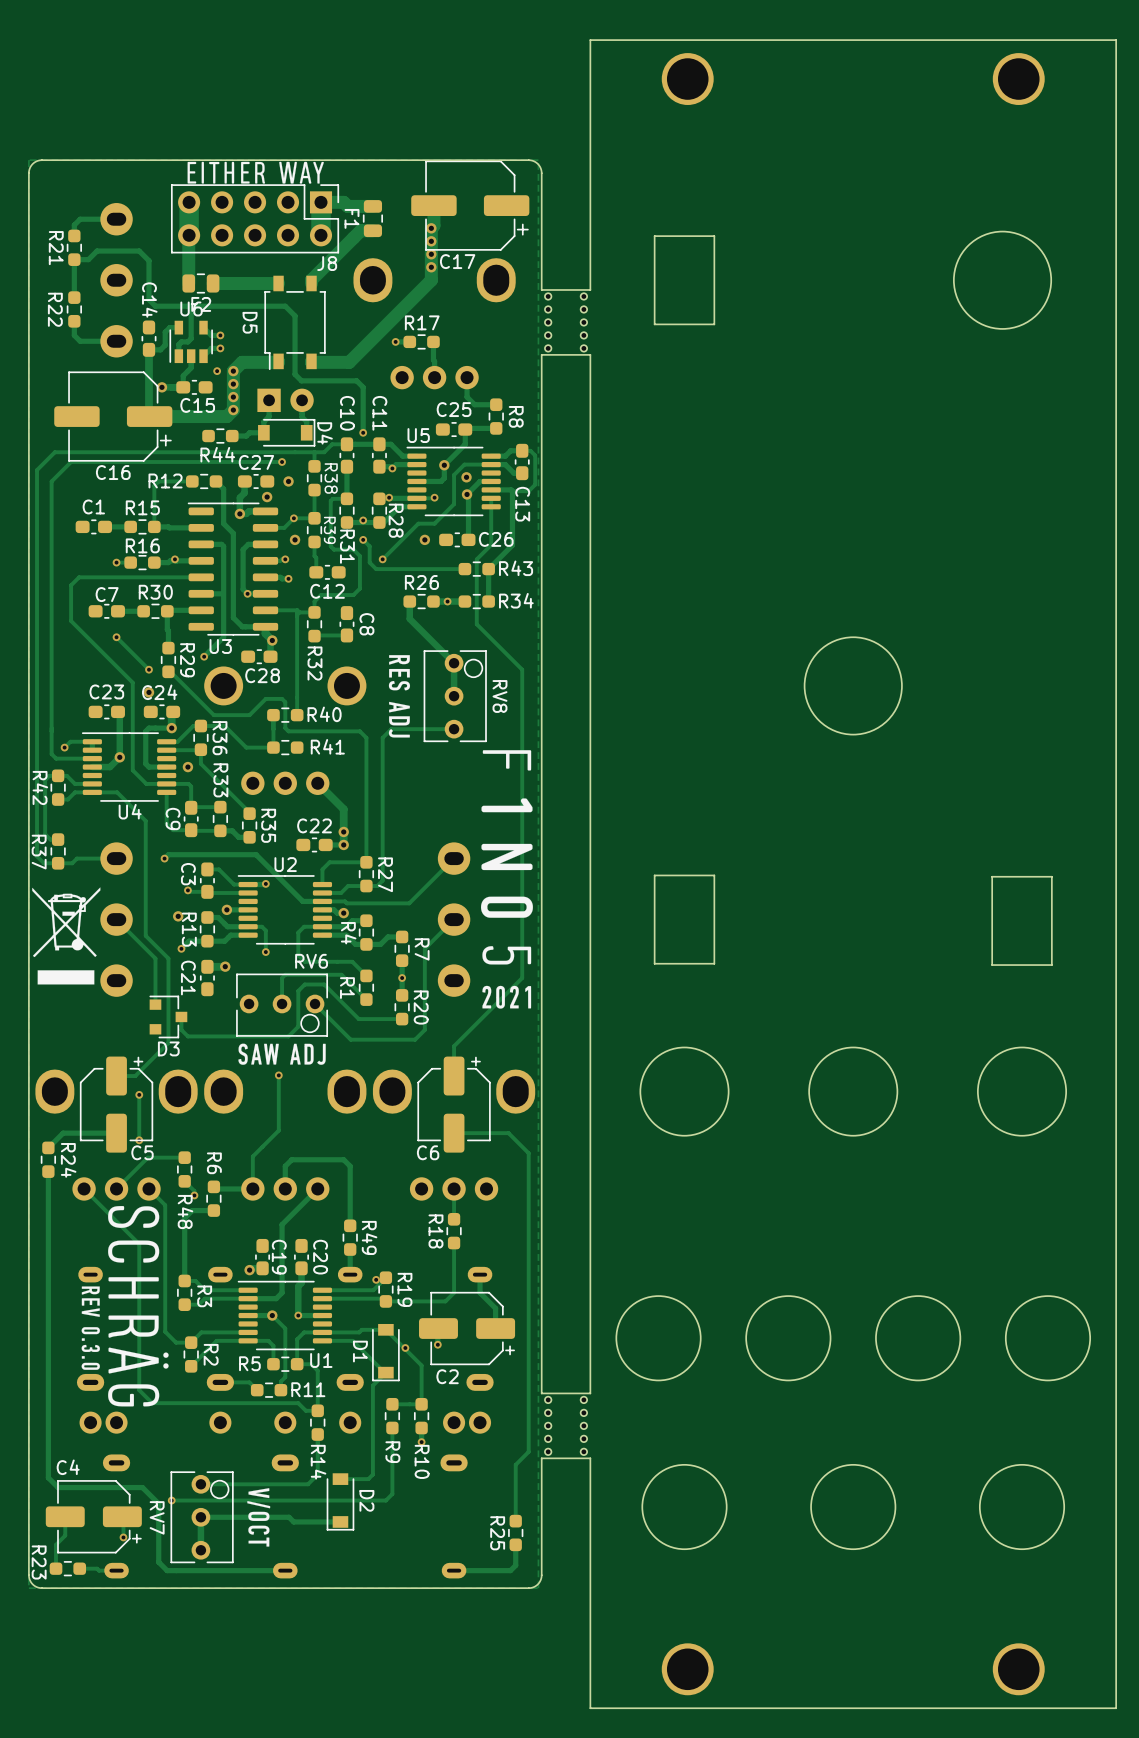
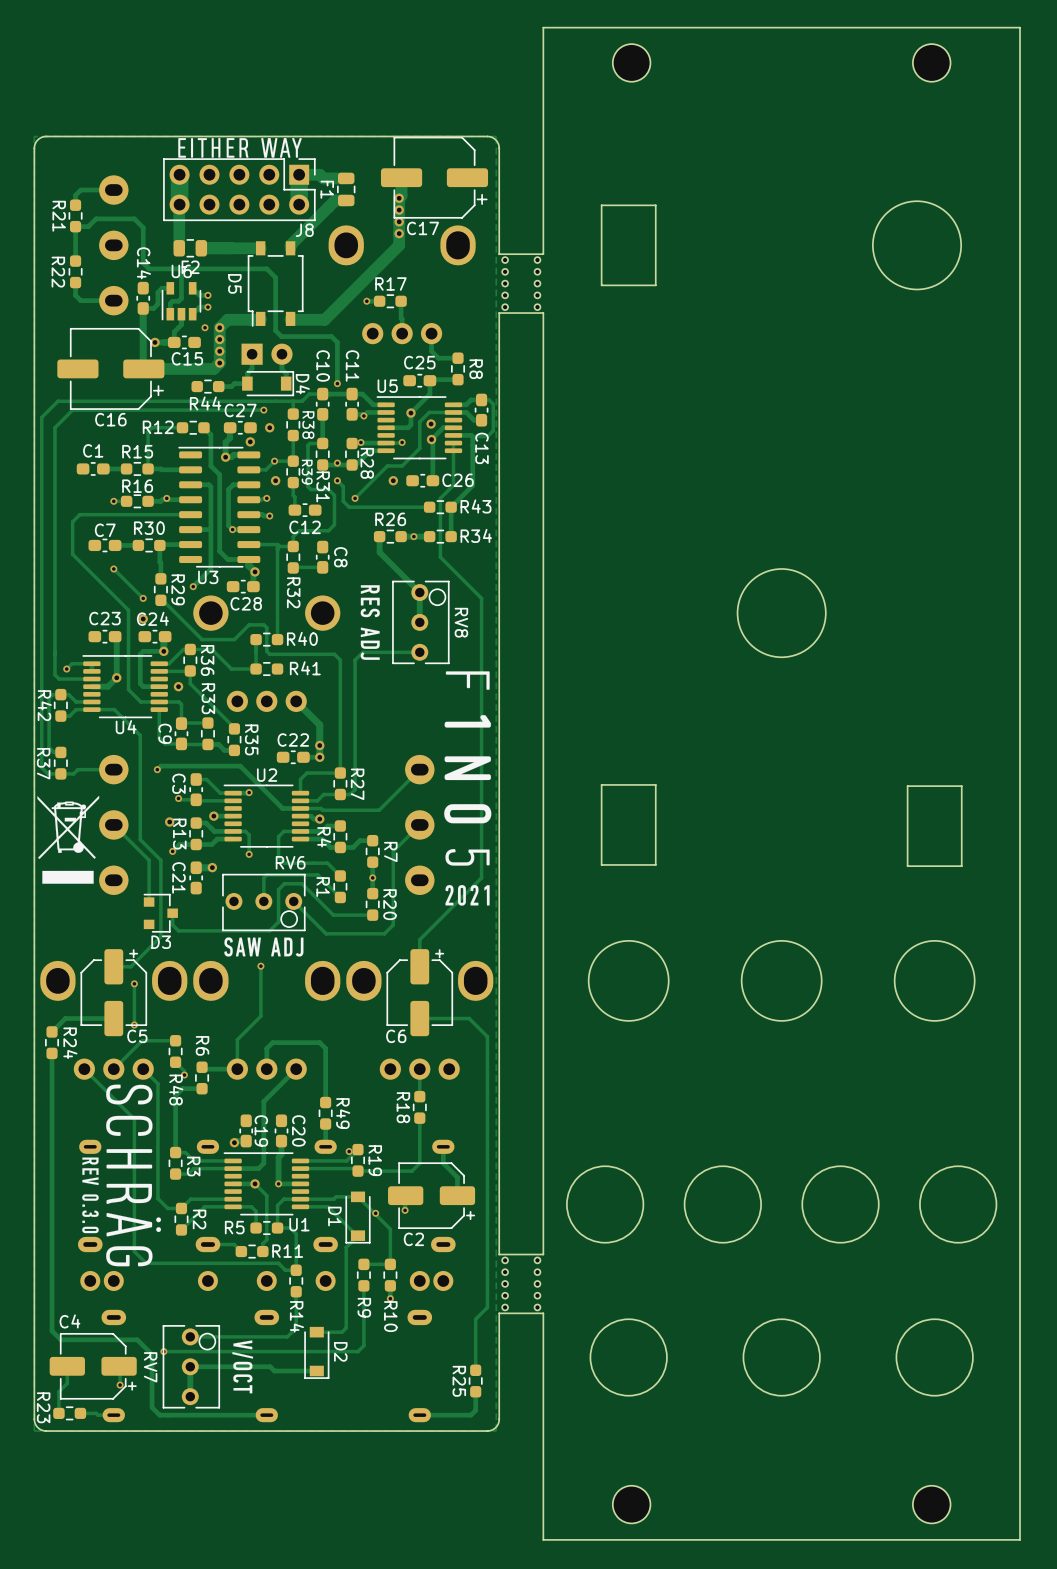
part footprint: [661, 53, 714, 105] -> [612, 44, 651, 82]
part footprint: [992, 53, 1045, 105] -> [912, 44, 951, 82]
part footprint: [661, 1643, 714, 1696] -> [612, 1485, 651, 1524]
part footprint: [992, 1643, 1045, 1696] -> [912, 1485, 951, 1524]

